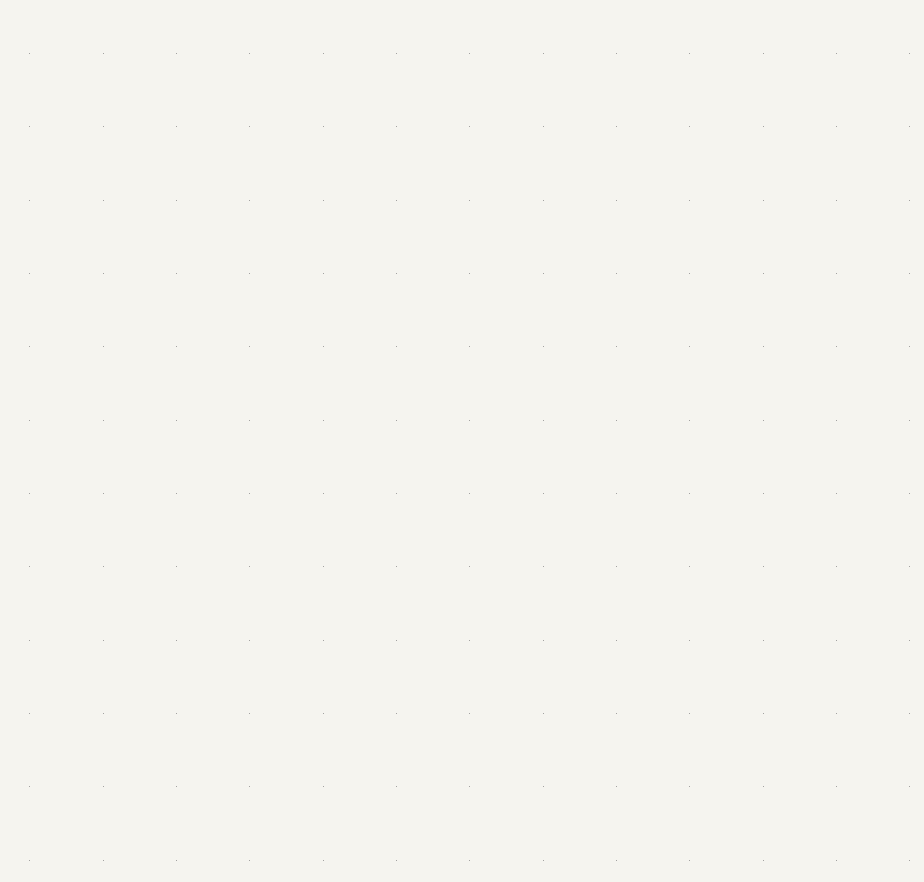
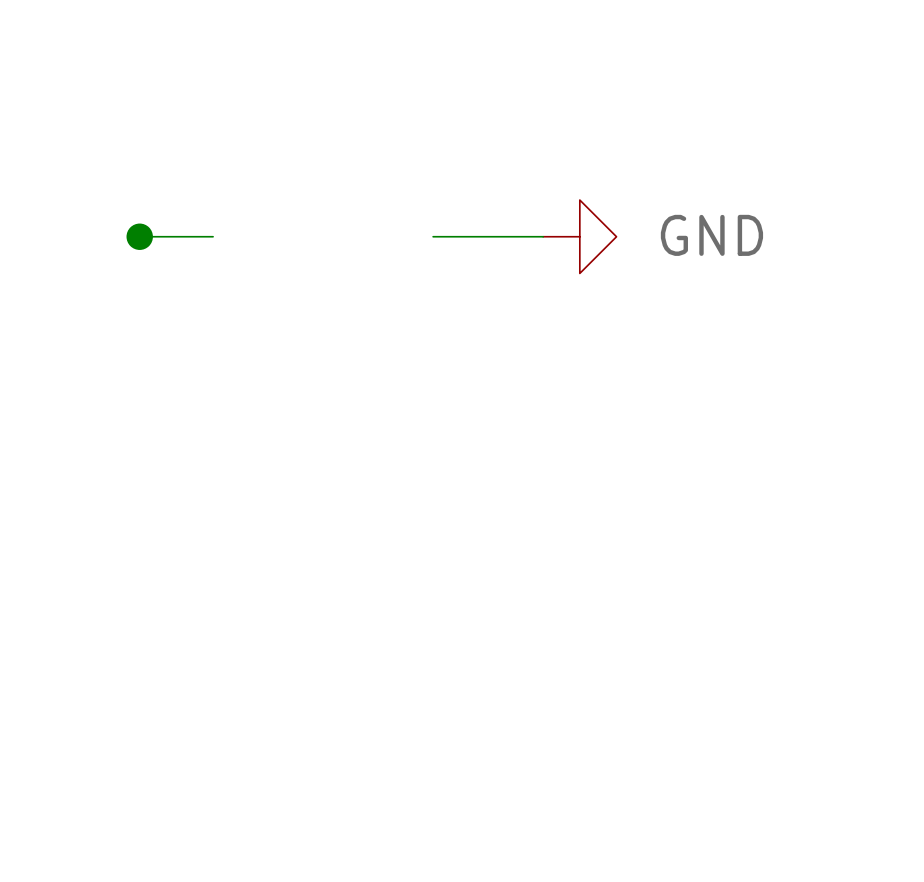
wire: none -> (139, 236) (213, 236)
junction: none -> (139, 236)
wire: none -> (433, 236) (543, 236)
power symbol: none -> GND (579, 236)

